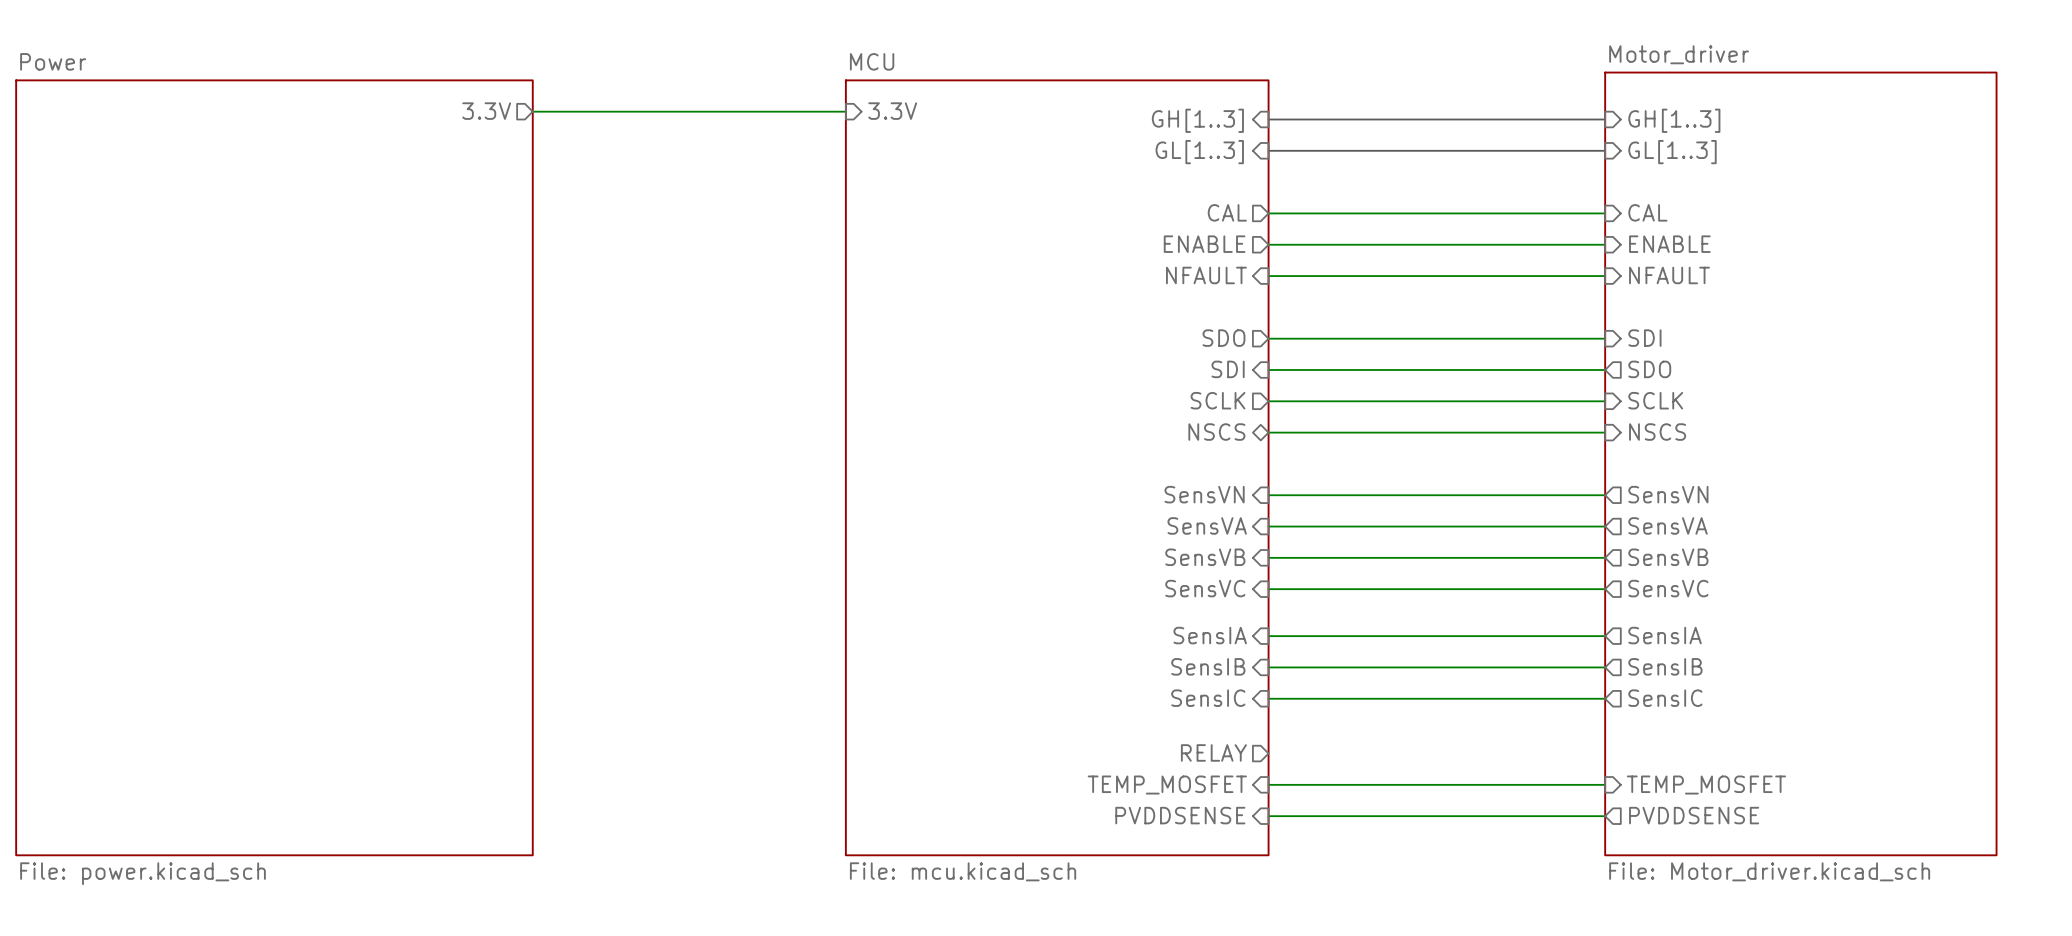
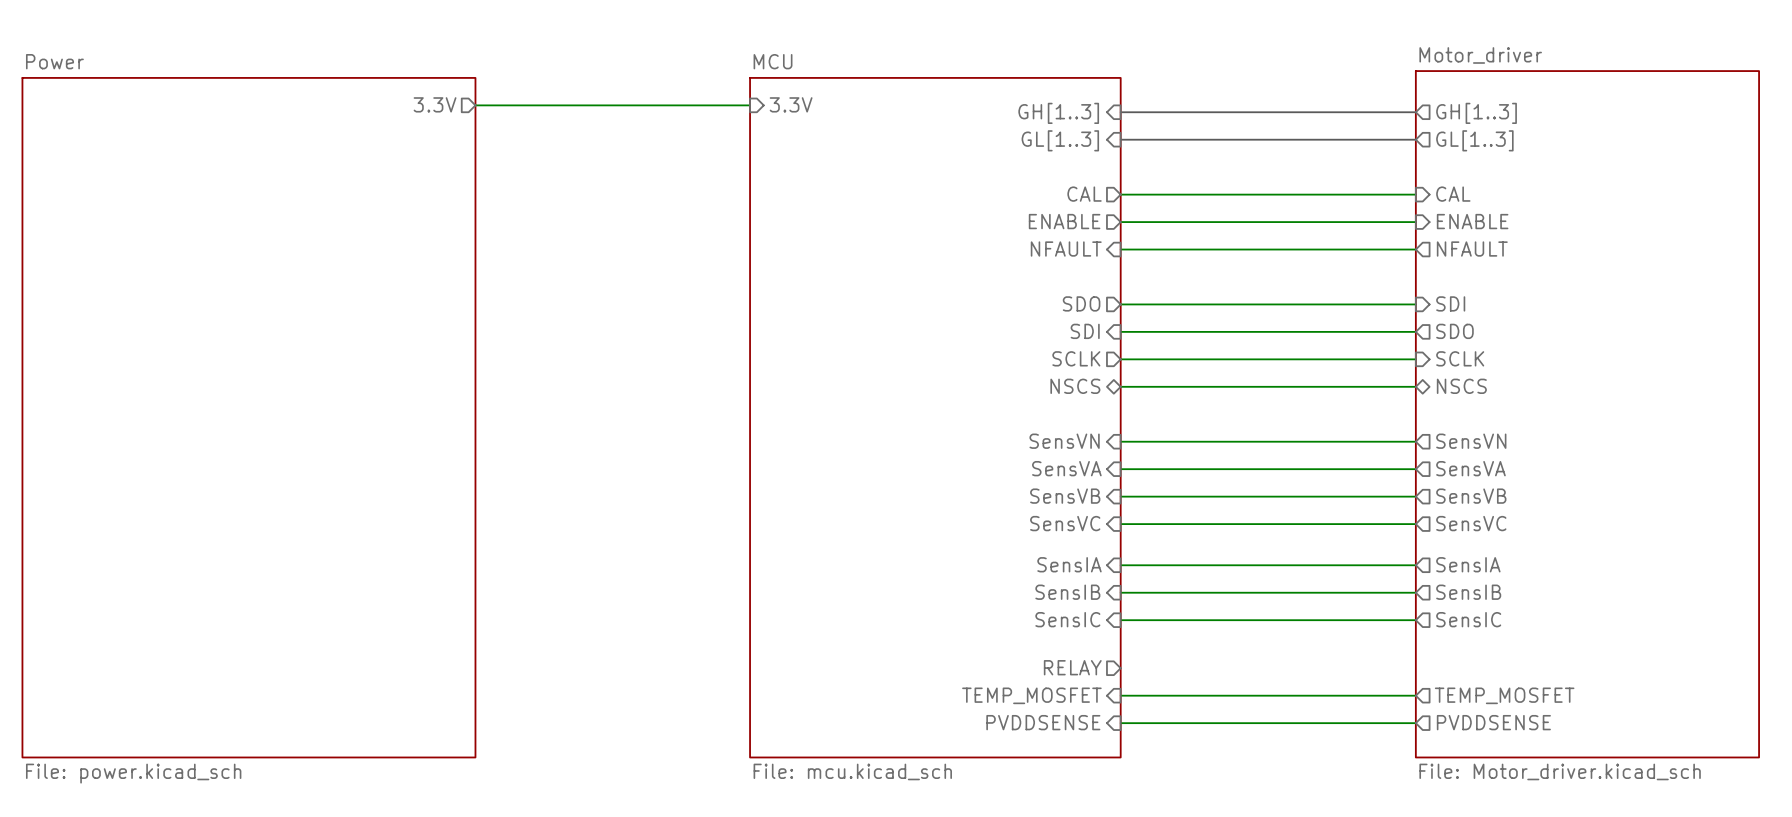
sheet pin shape: input (1674, 120) -> output (1476, 113)
sheet pin shape: input (1672, 152) -> output (1474, 140)
sheet pin shape: input (1669, 275) -> output (1472, 249)
sheet pin shape: input (1657, 432) -> bidirectional (1461, 386)
sheet pin shape: input (1706, 785) -> output (1504, 695)

